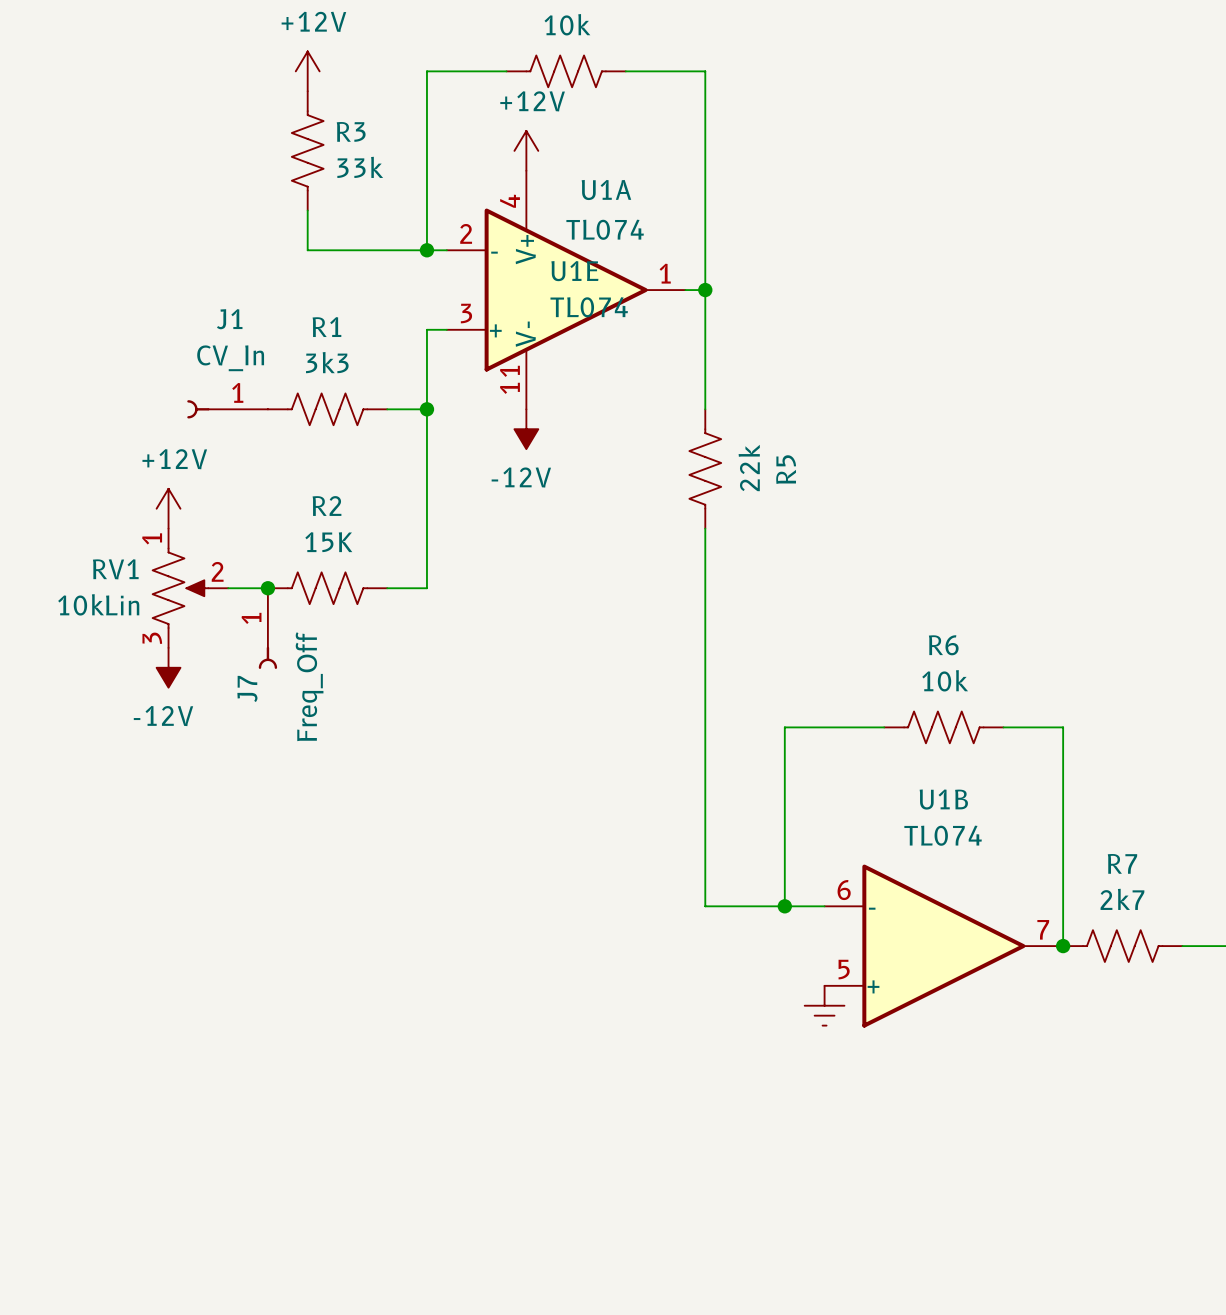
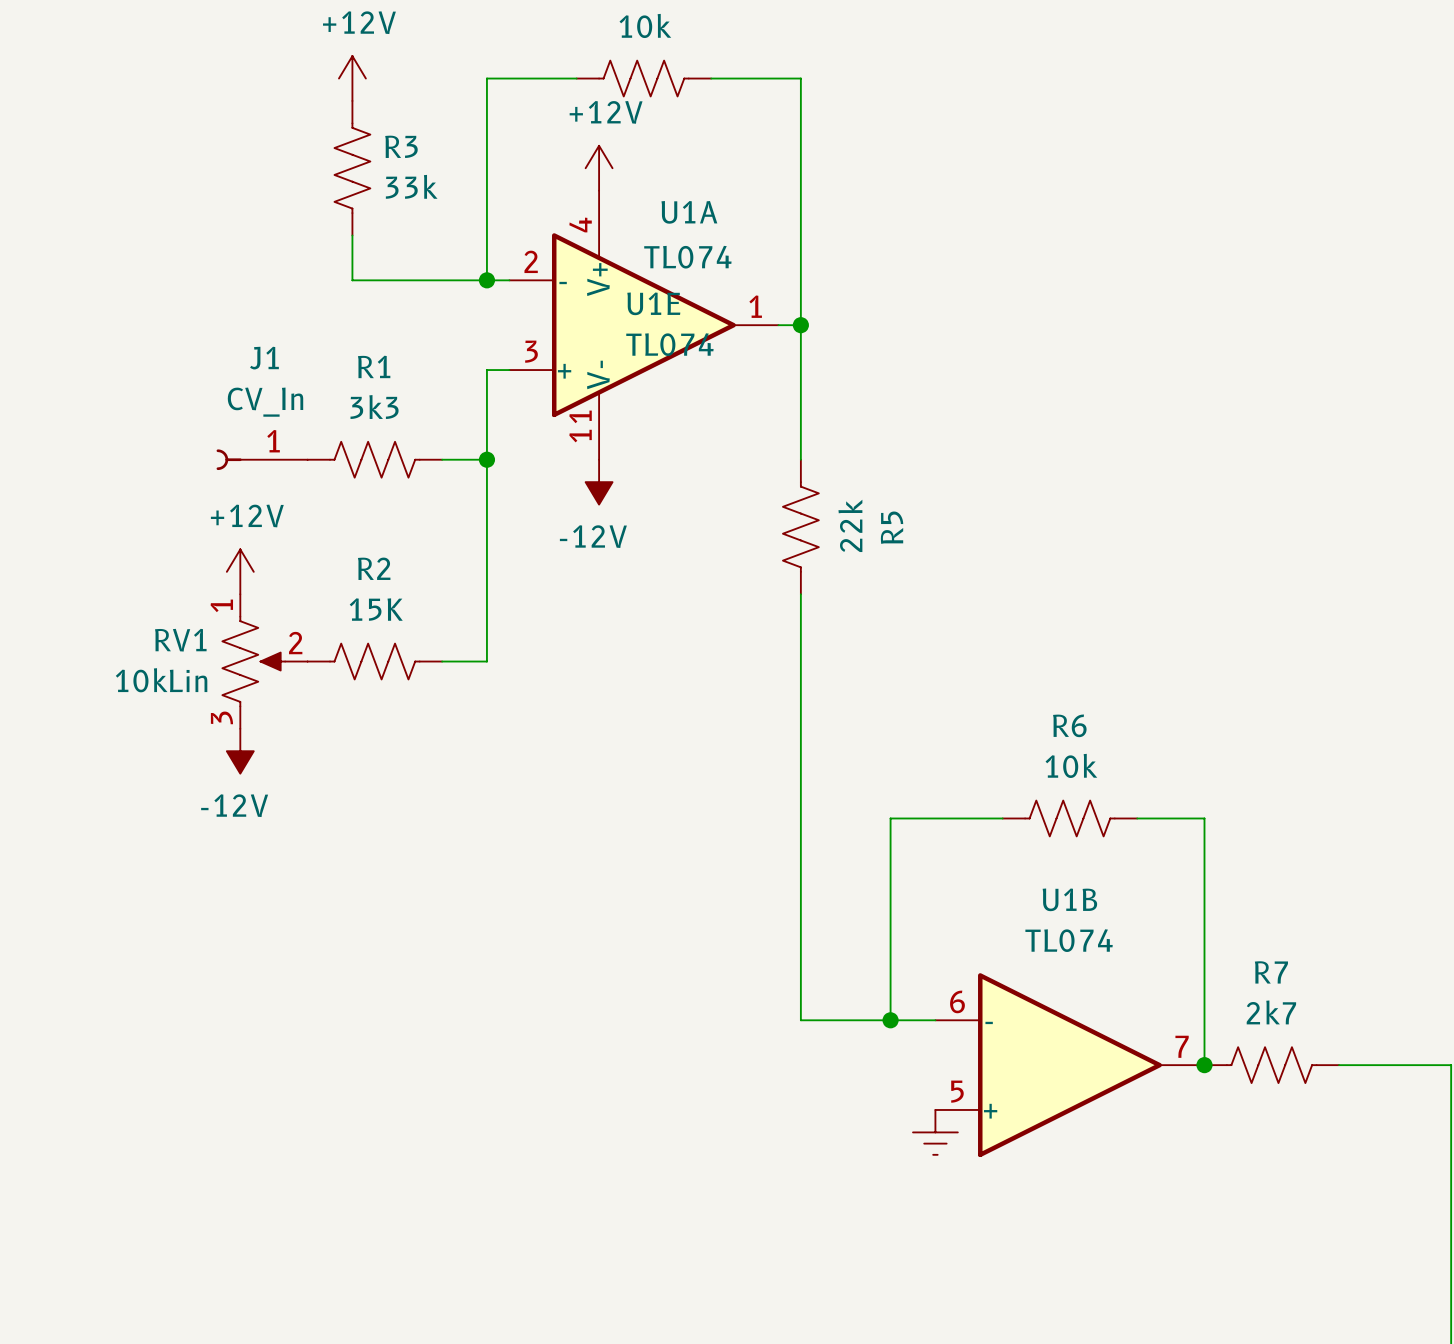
power symbol position: +12V (168, 508) -> +12V (240, 571)
RV1 position: (190, 588) -> (264, 661)
junction: (267, 588) -> none
J7: Freq_Off (267, 628) -> none
power symbol position: -12V (168, 667) -> -12V (240, 751)

